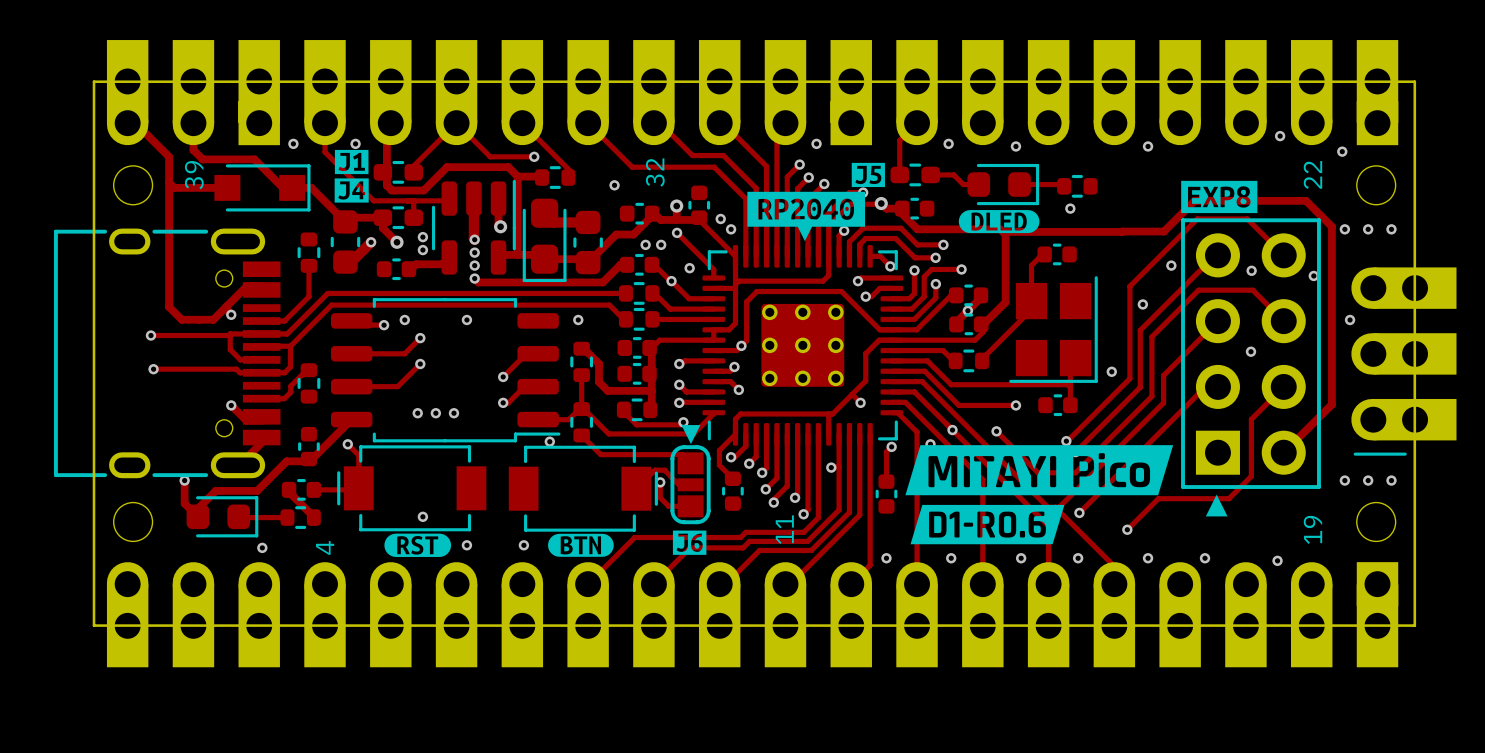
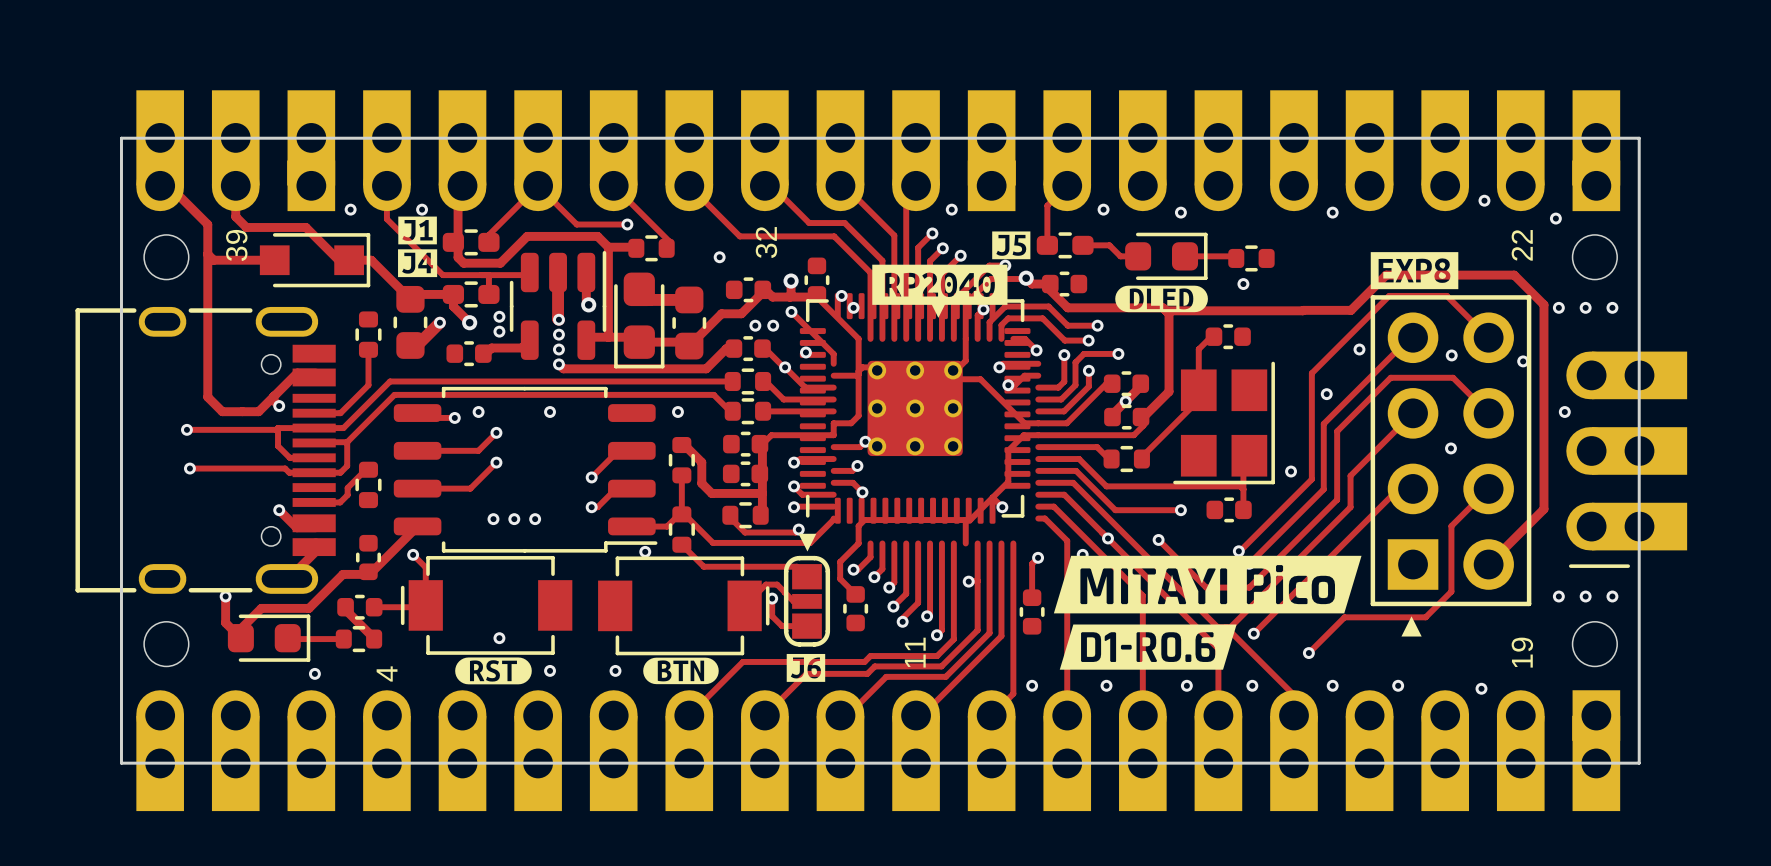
part position: (802, 345) -> (915, 408)

